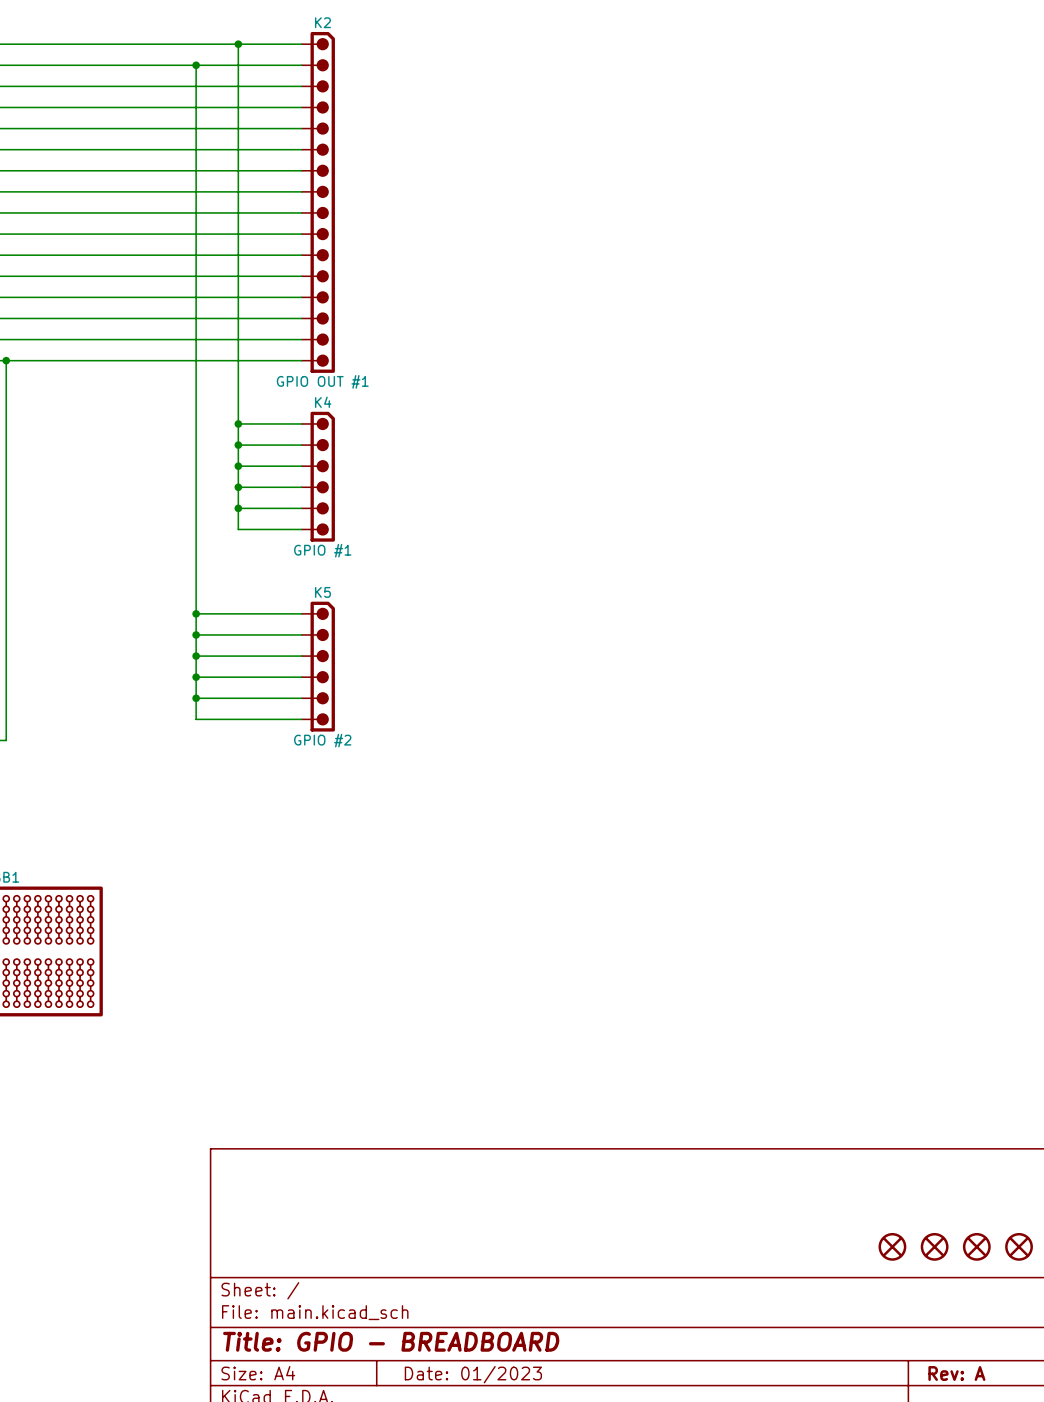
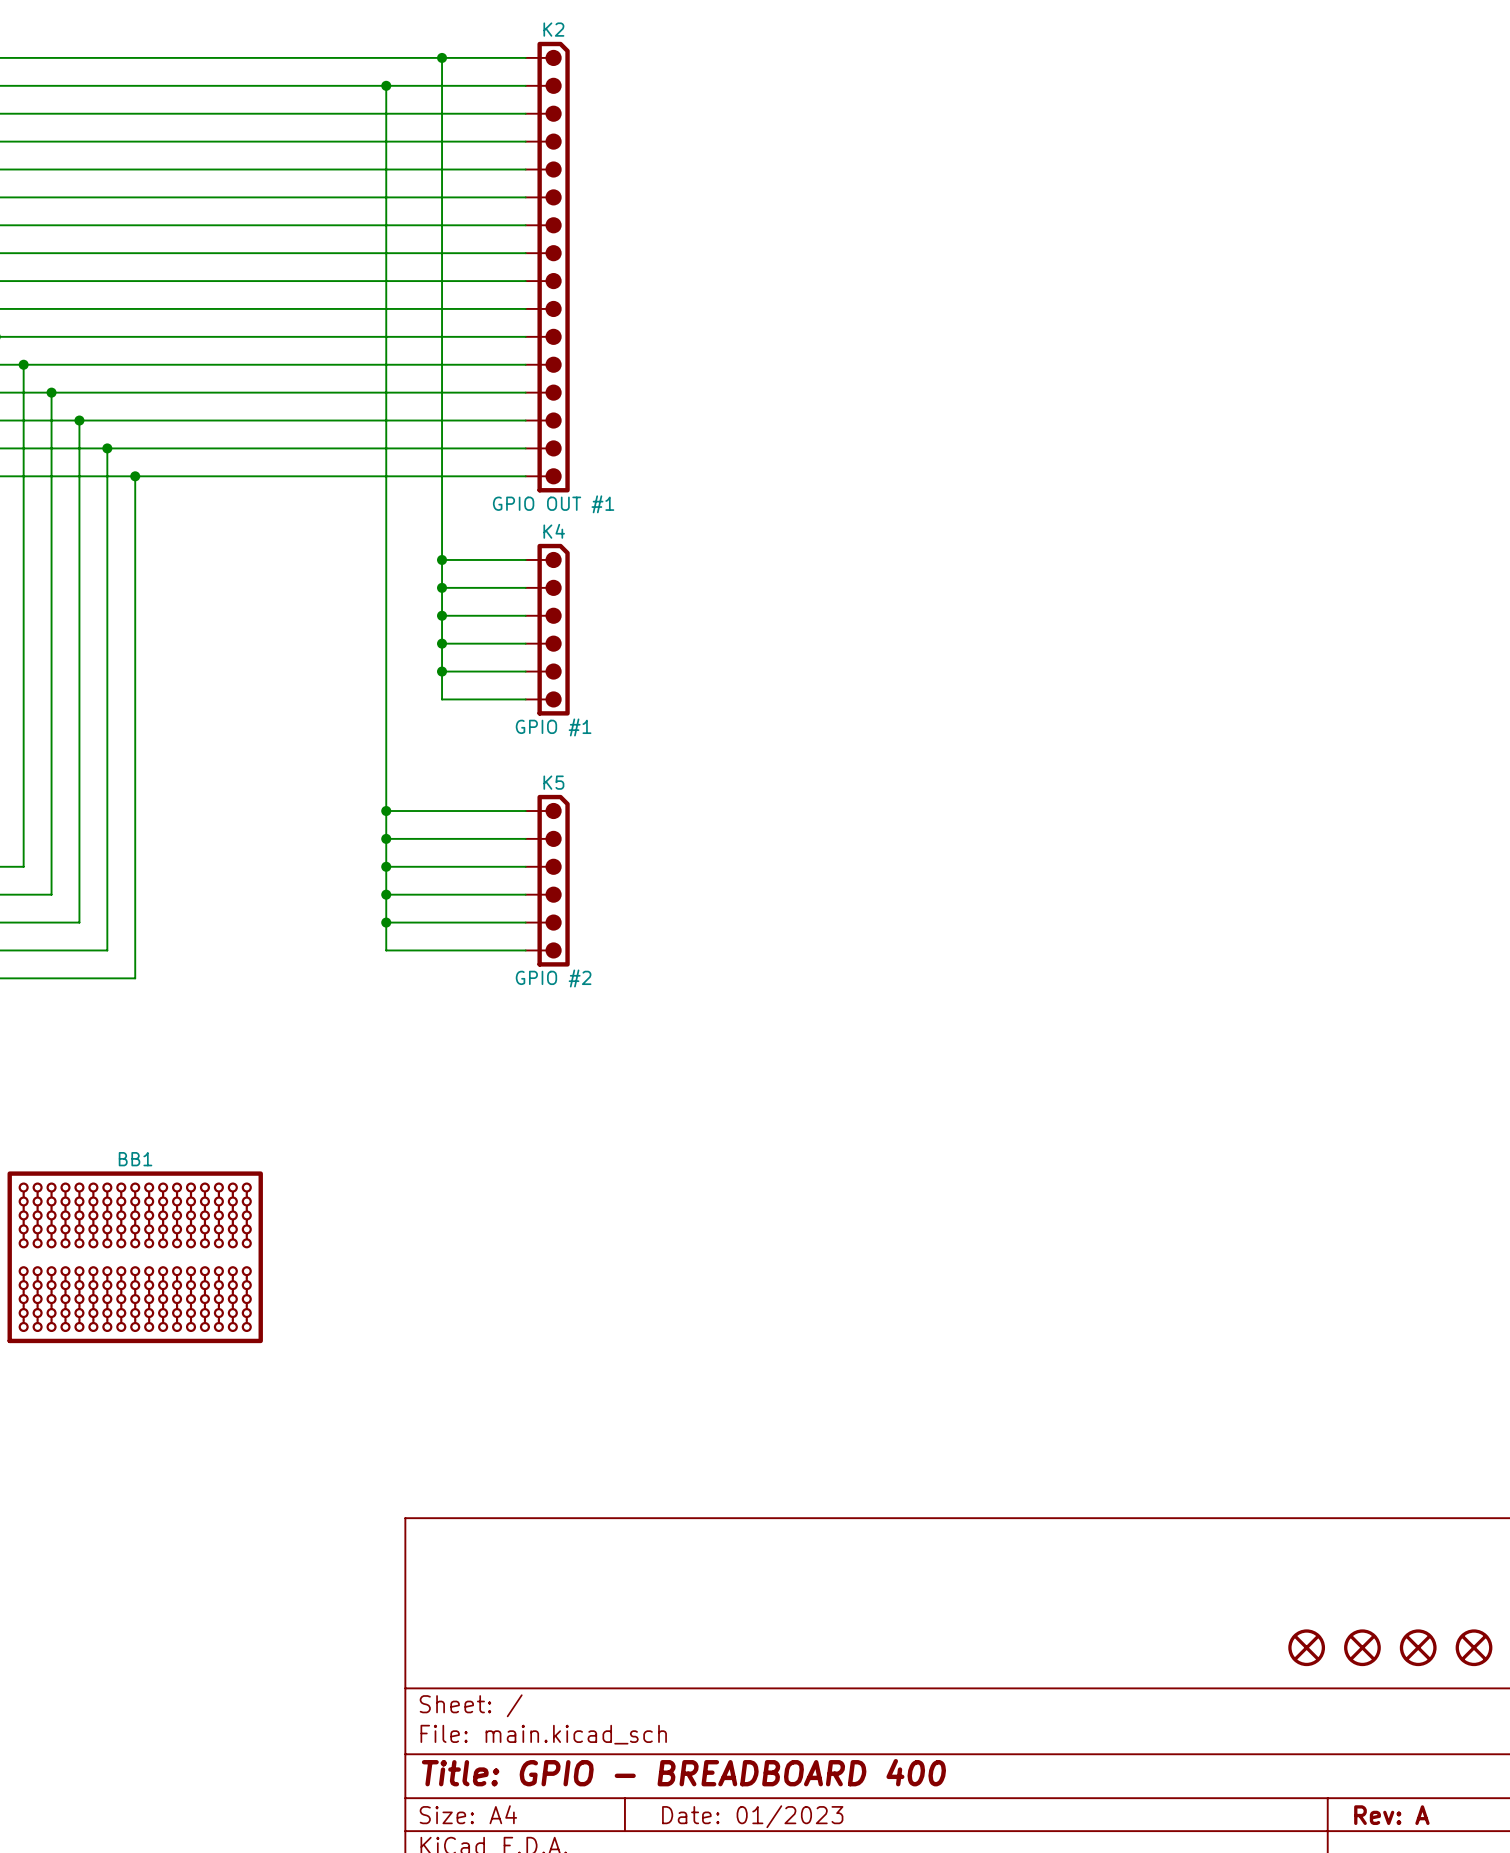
title block: Title: GPIO - BREADBOARD (391, 1341) -> Title: GPIO - BREADBOARD 400 (683, 1772)

